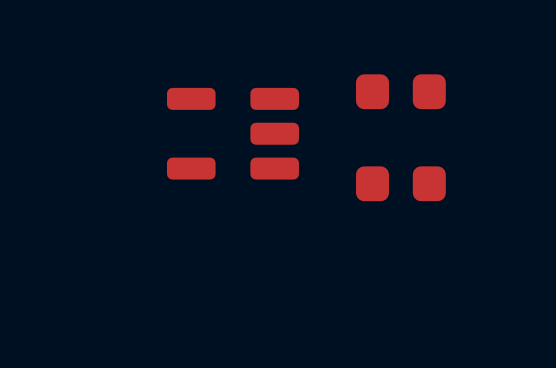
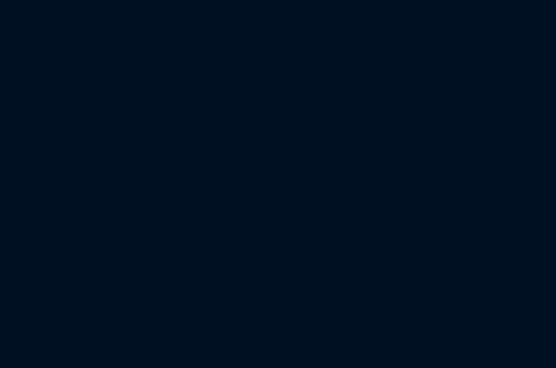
part: (400, 91) -> none
part: (232, 133) -> none
part: (400, 183) -> none

